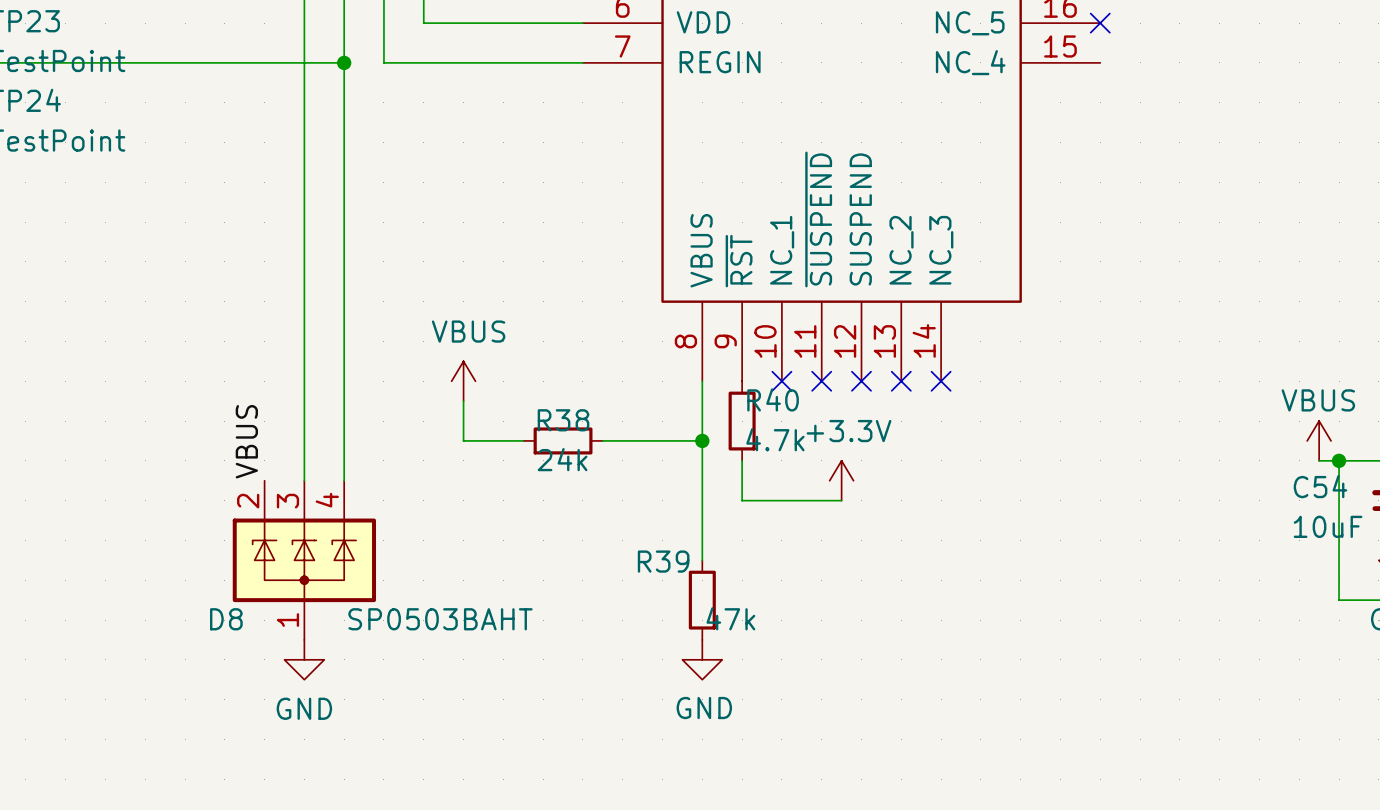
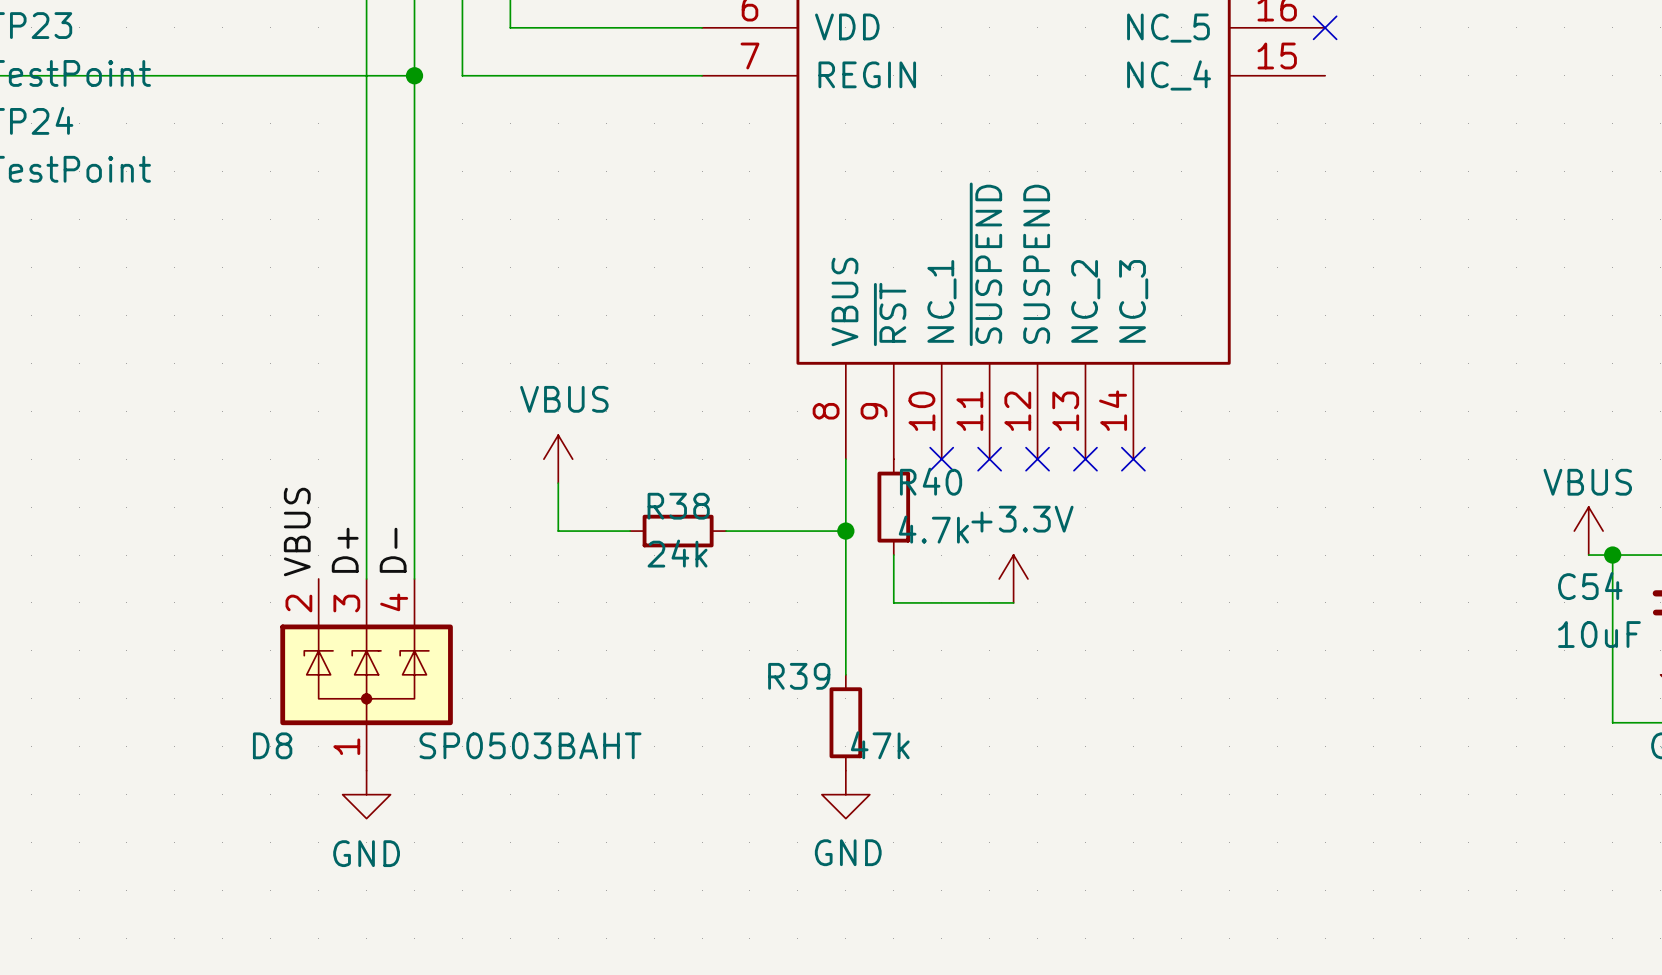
label: none -> D+ (345, 550)
label: none -> D- (393, 550)

